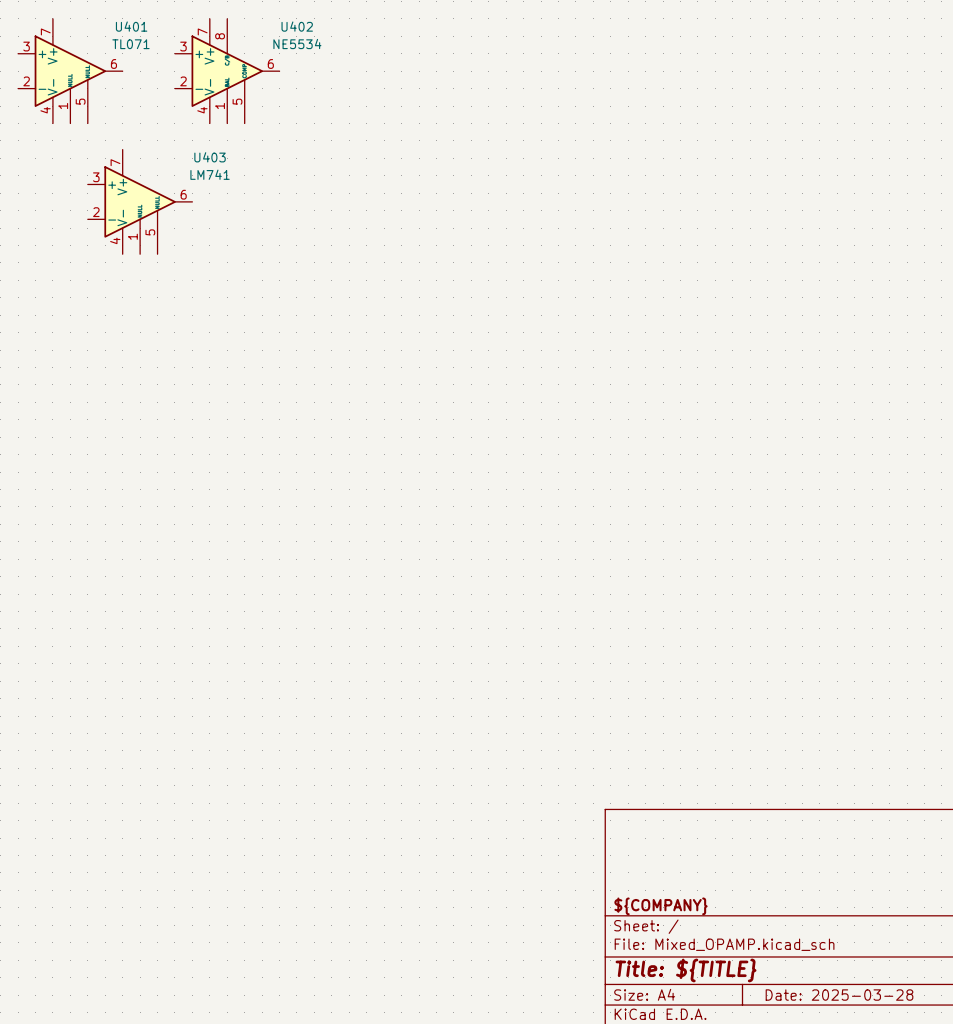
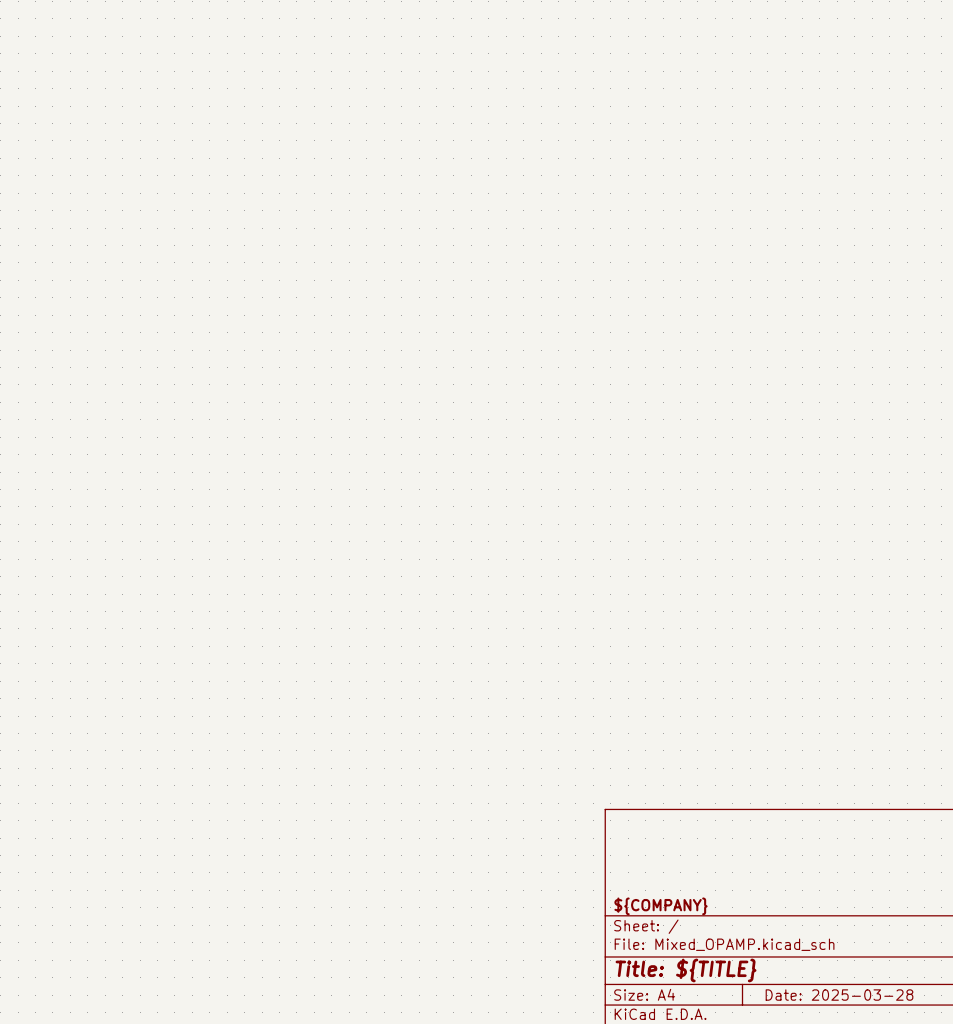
U401: TL071 (70, 71) -> none
U402: NE5534 (227, 71) -> none
U403: LM741 (140, 201) -> none

